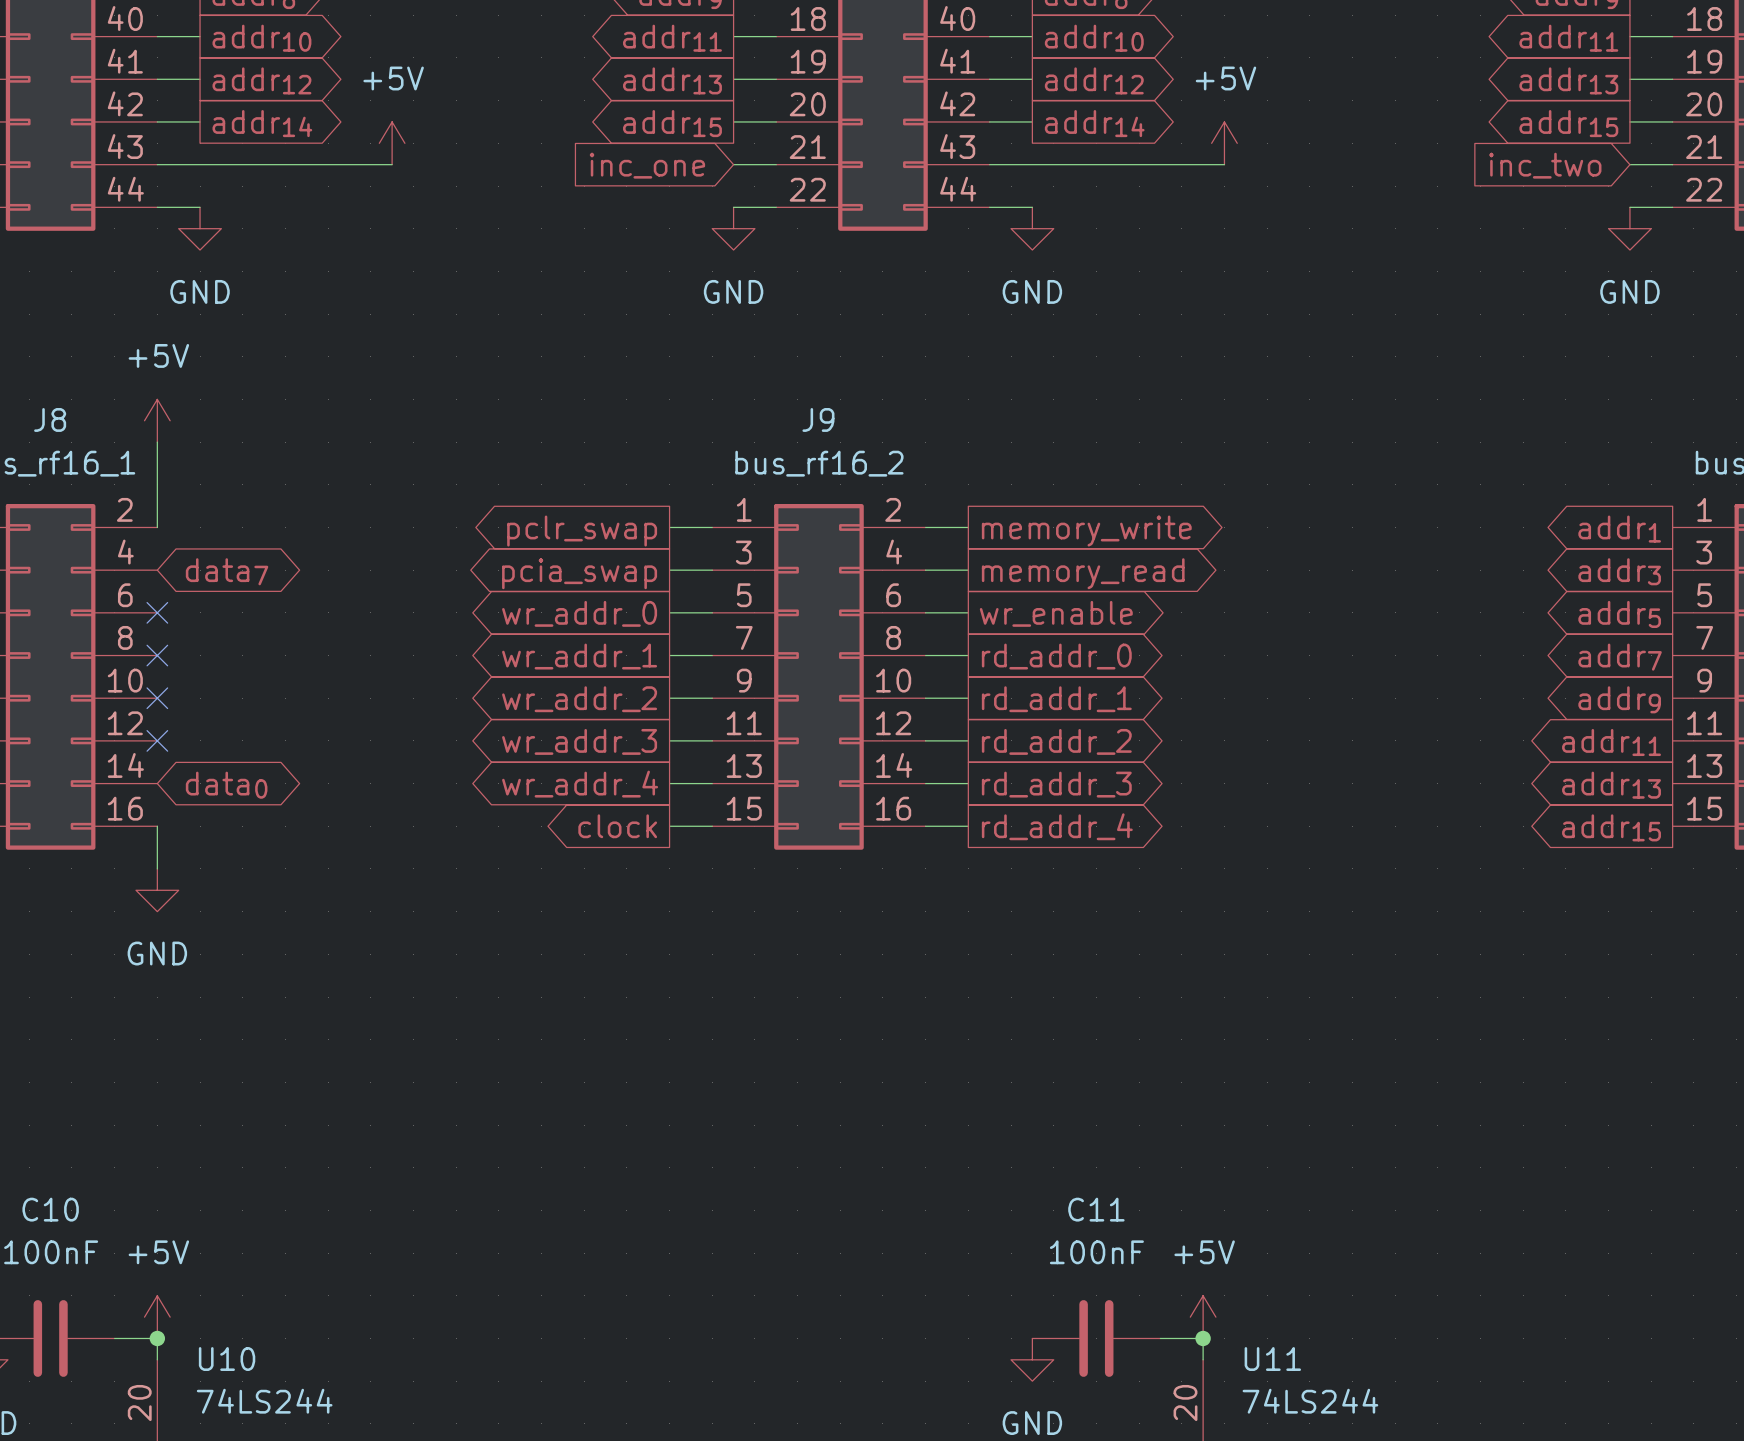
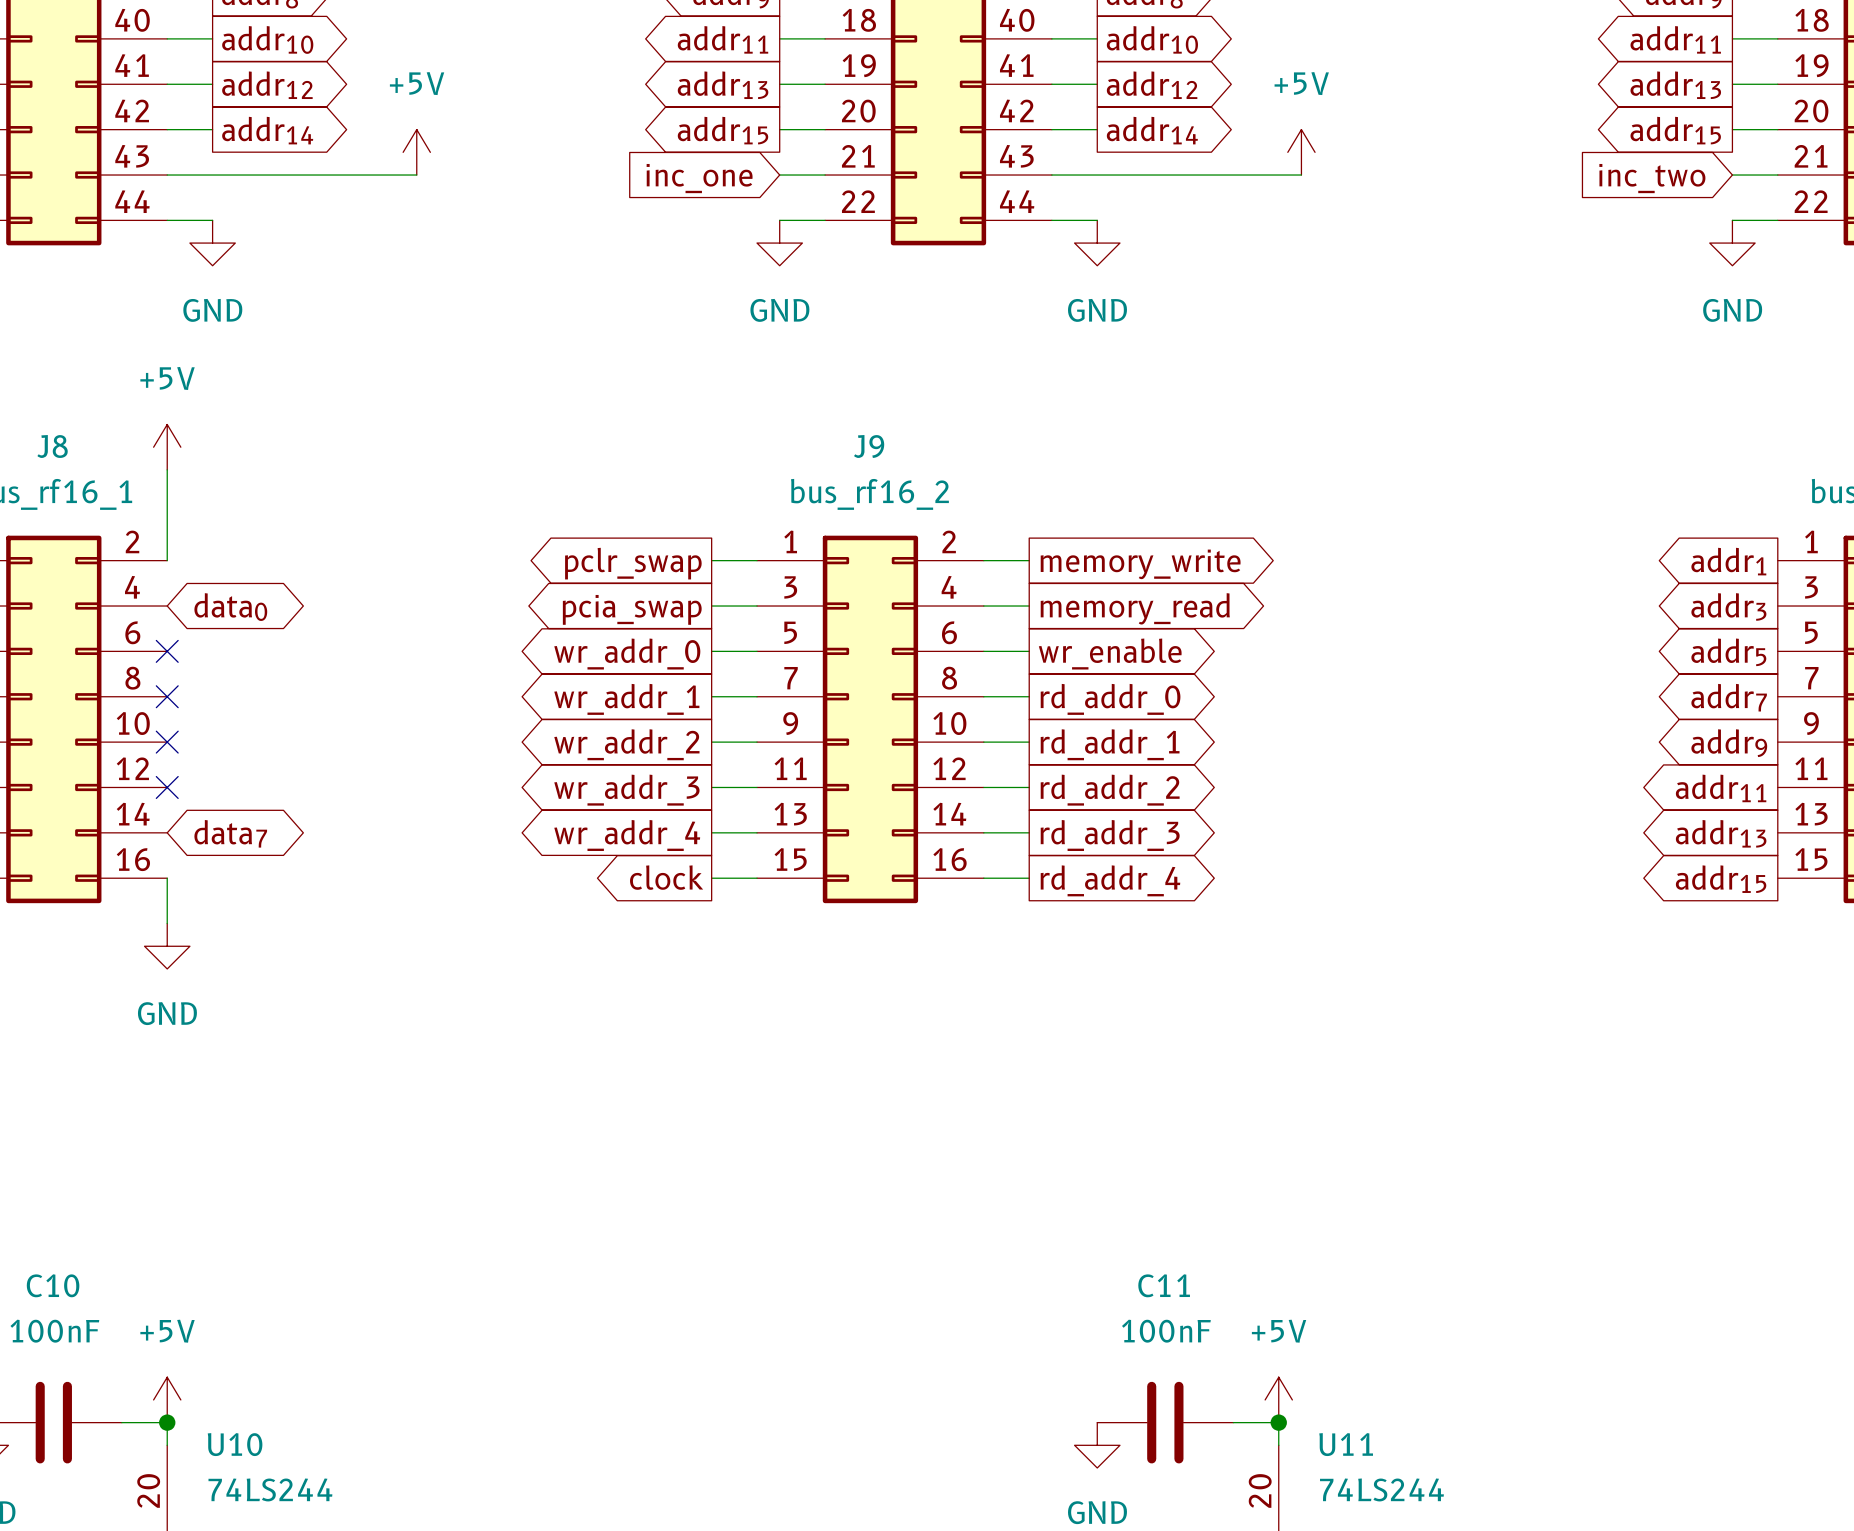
global label: data7 (227, 571) -> data0 (230, 607)
global label: data0 (226, 785) -> data7 (230, 833)

